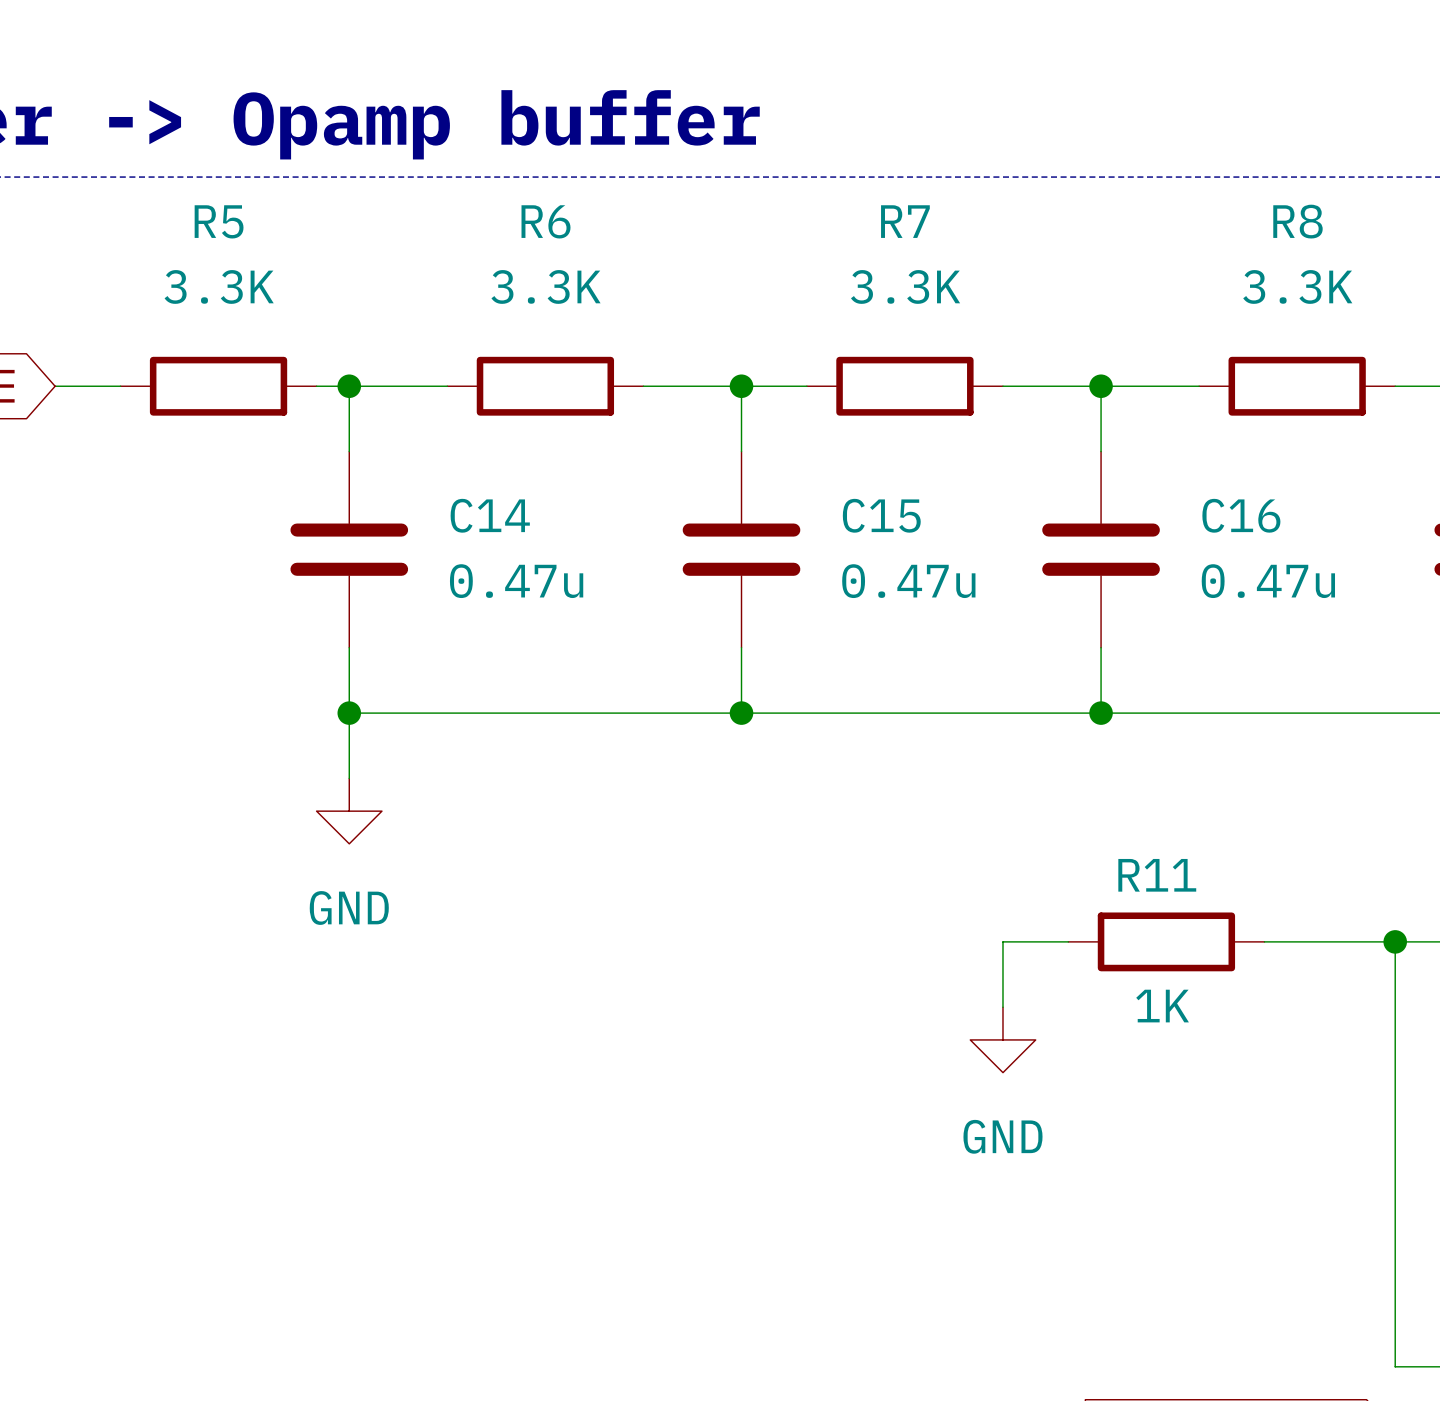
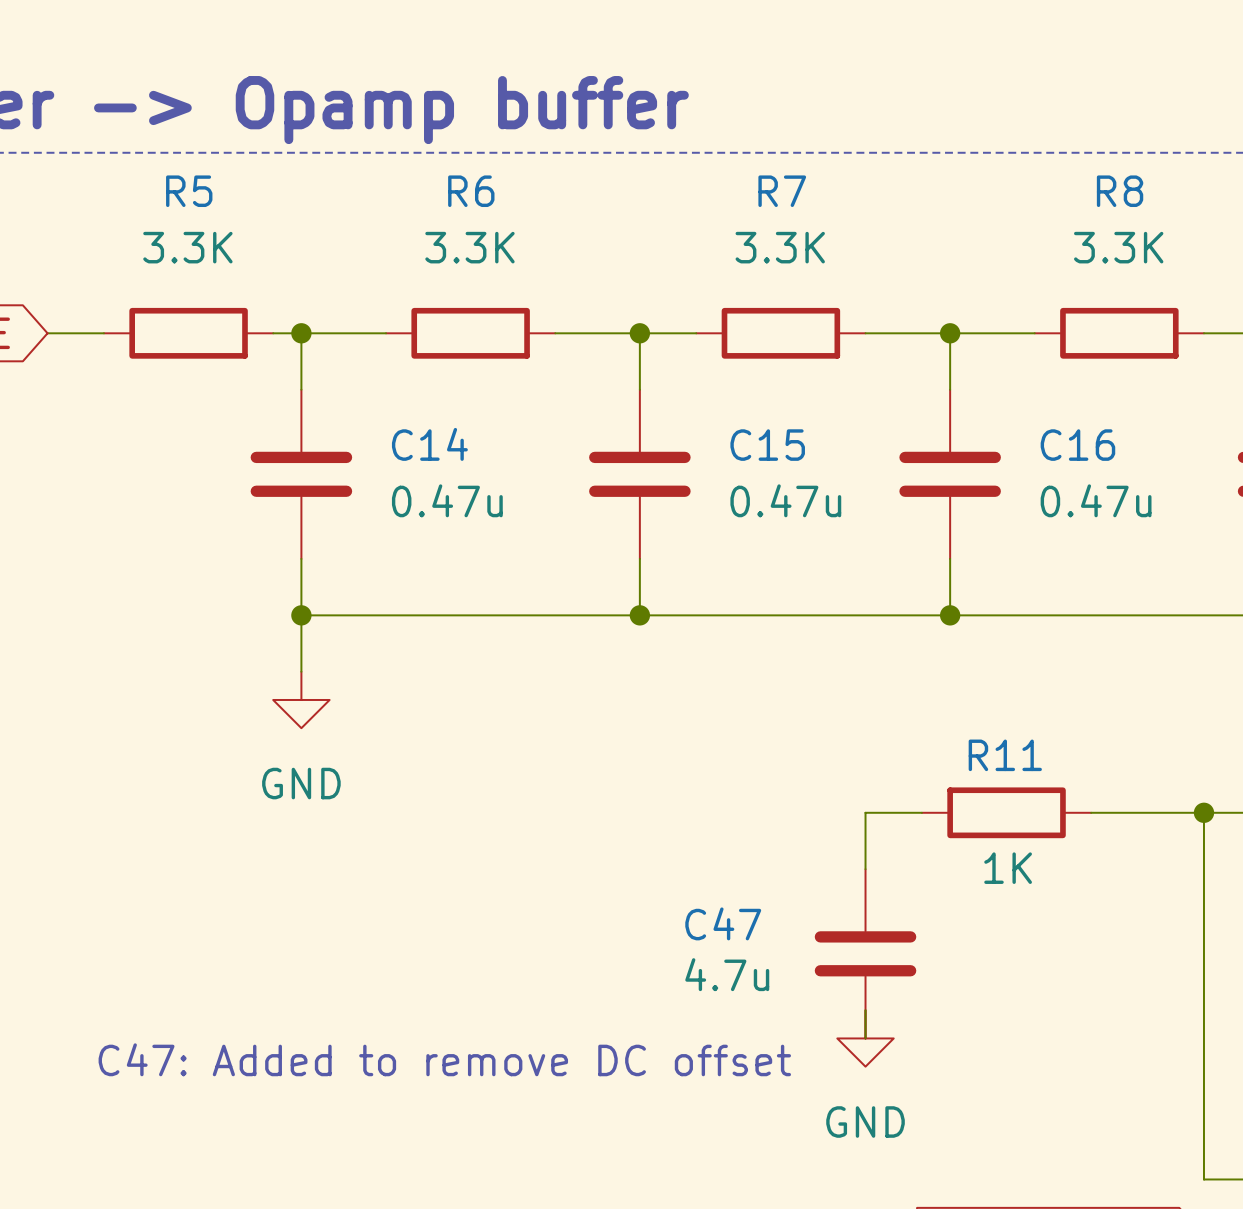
power symbol position: GND (1002, 1039) -> GND (865, 1038)
C47: none -> 4.7u (865, 953)
wire: none -> (865, 1010) (865, 1038)
text: none -> C47: Added to remove DC offset (444, 1059)

